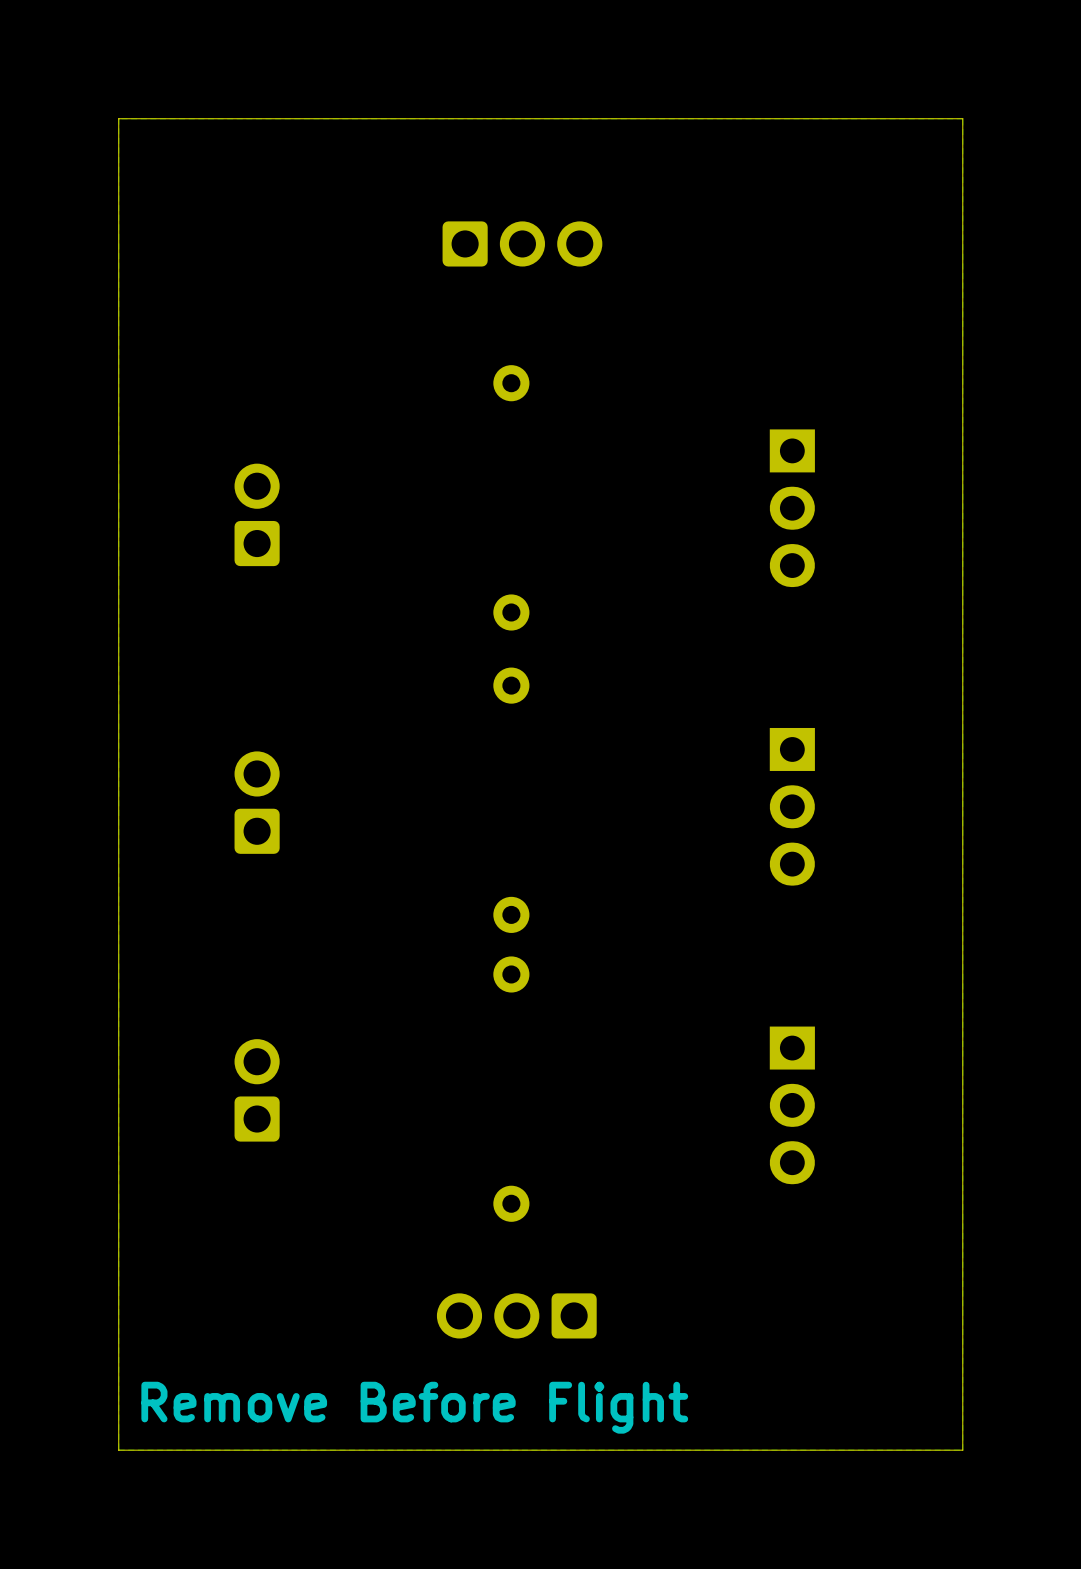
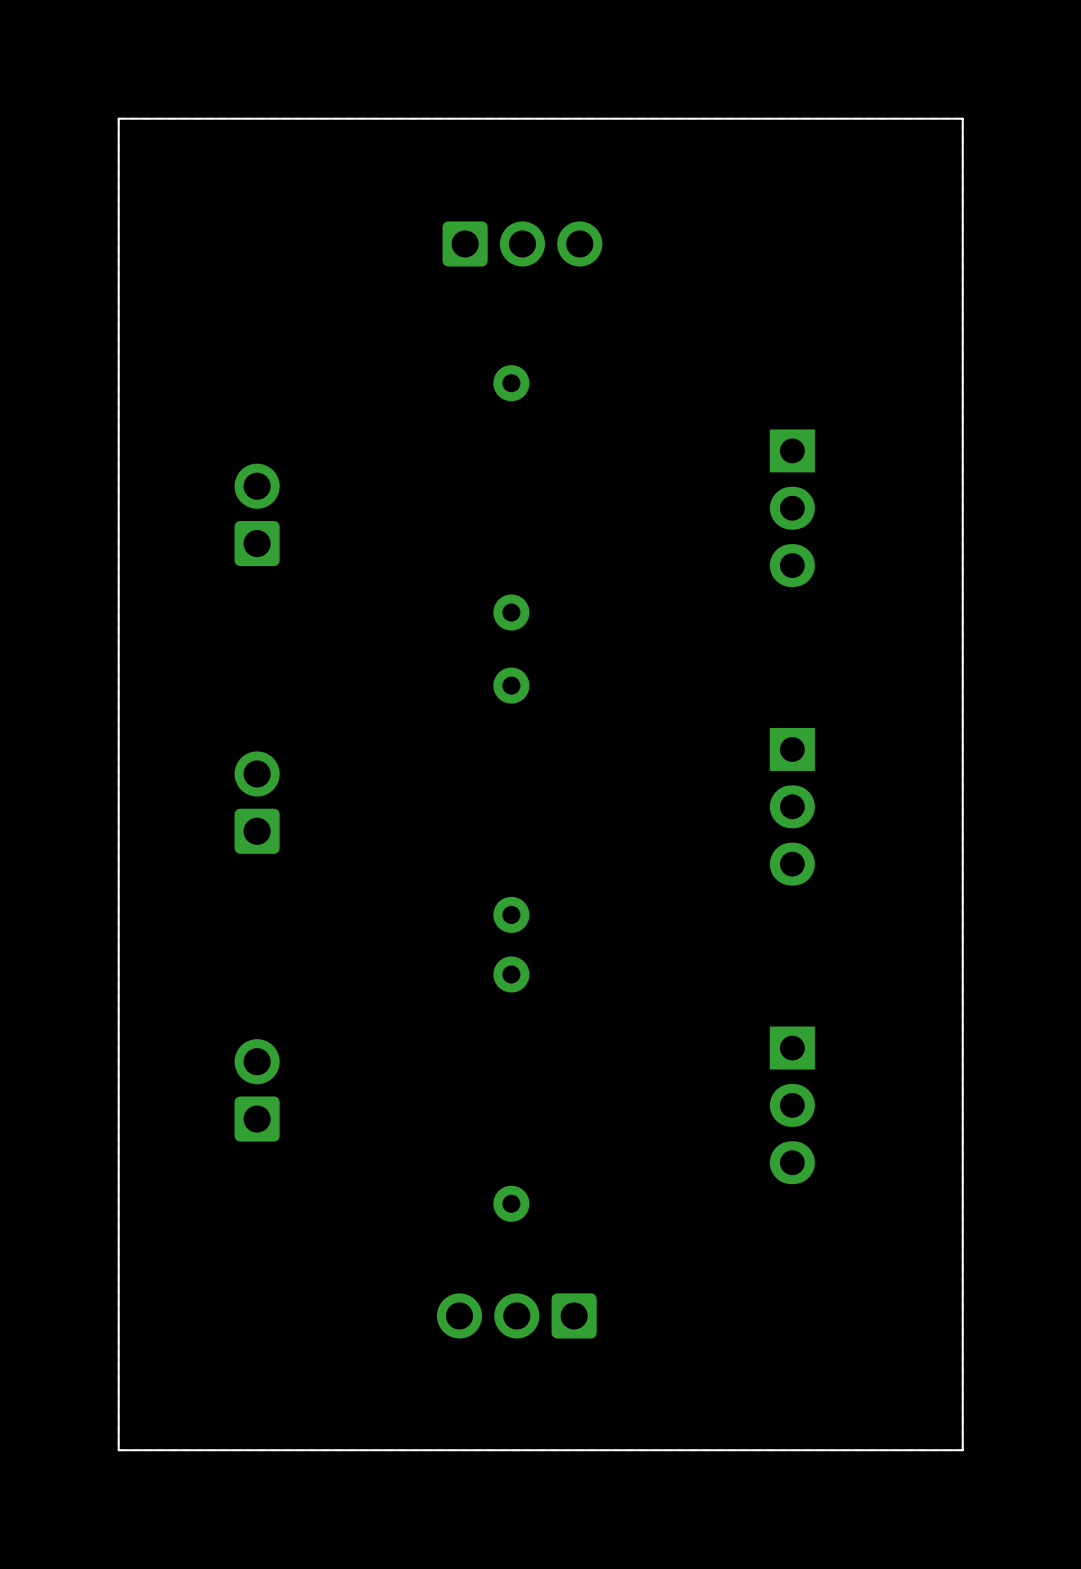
text: Remove Before Flight (414, 1407) -> none

